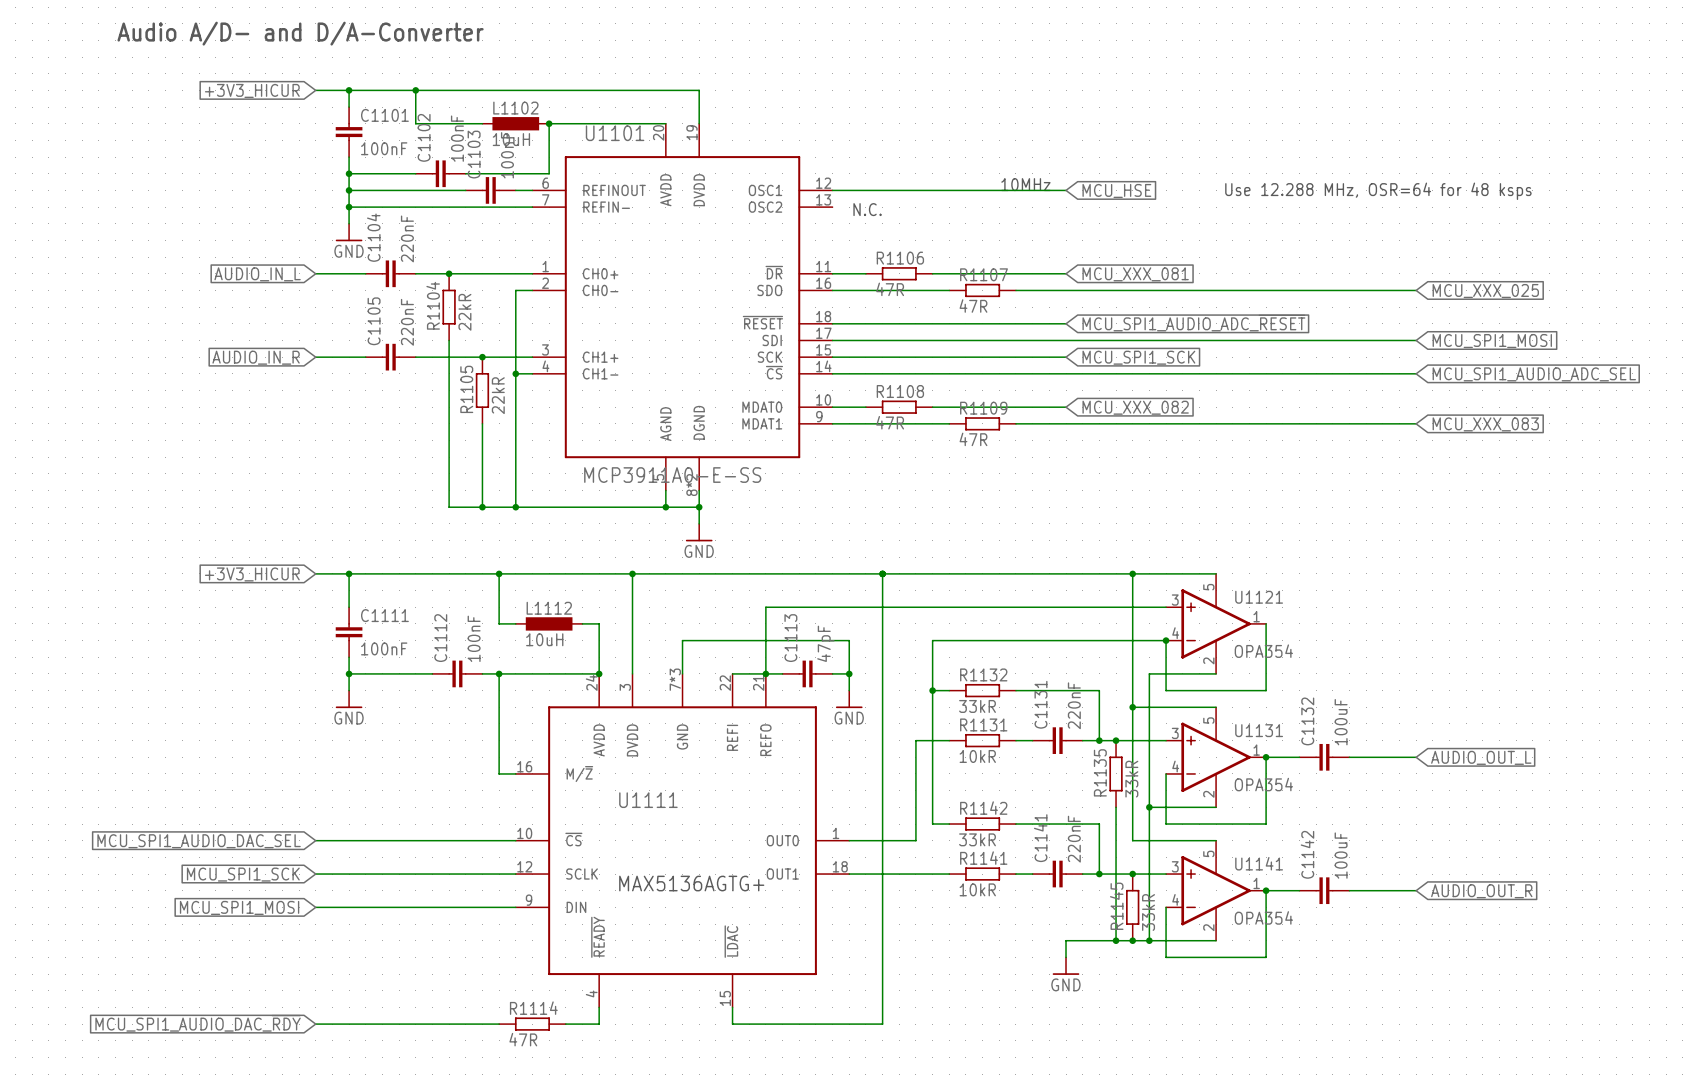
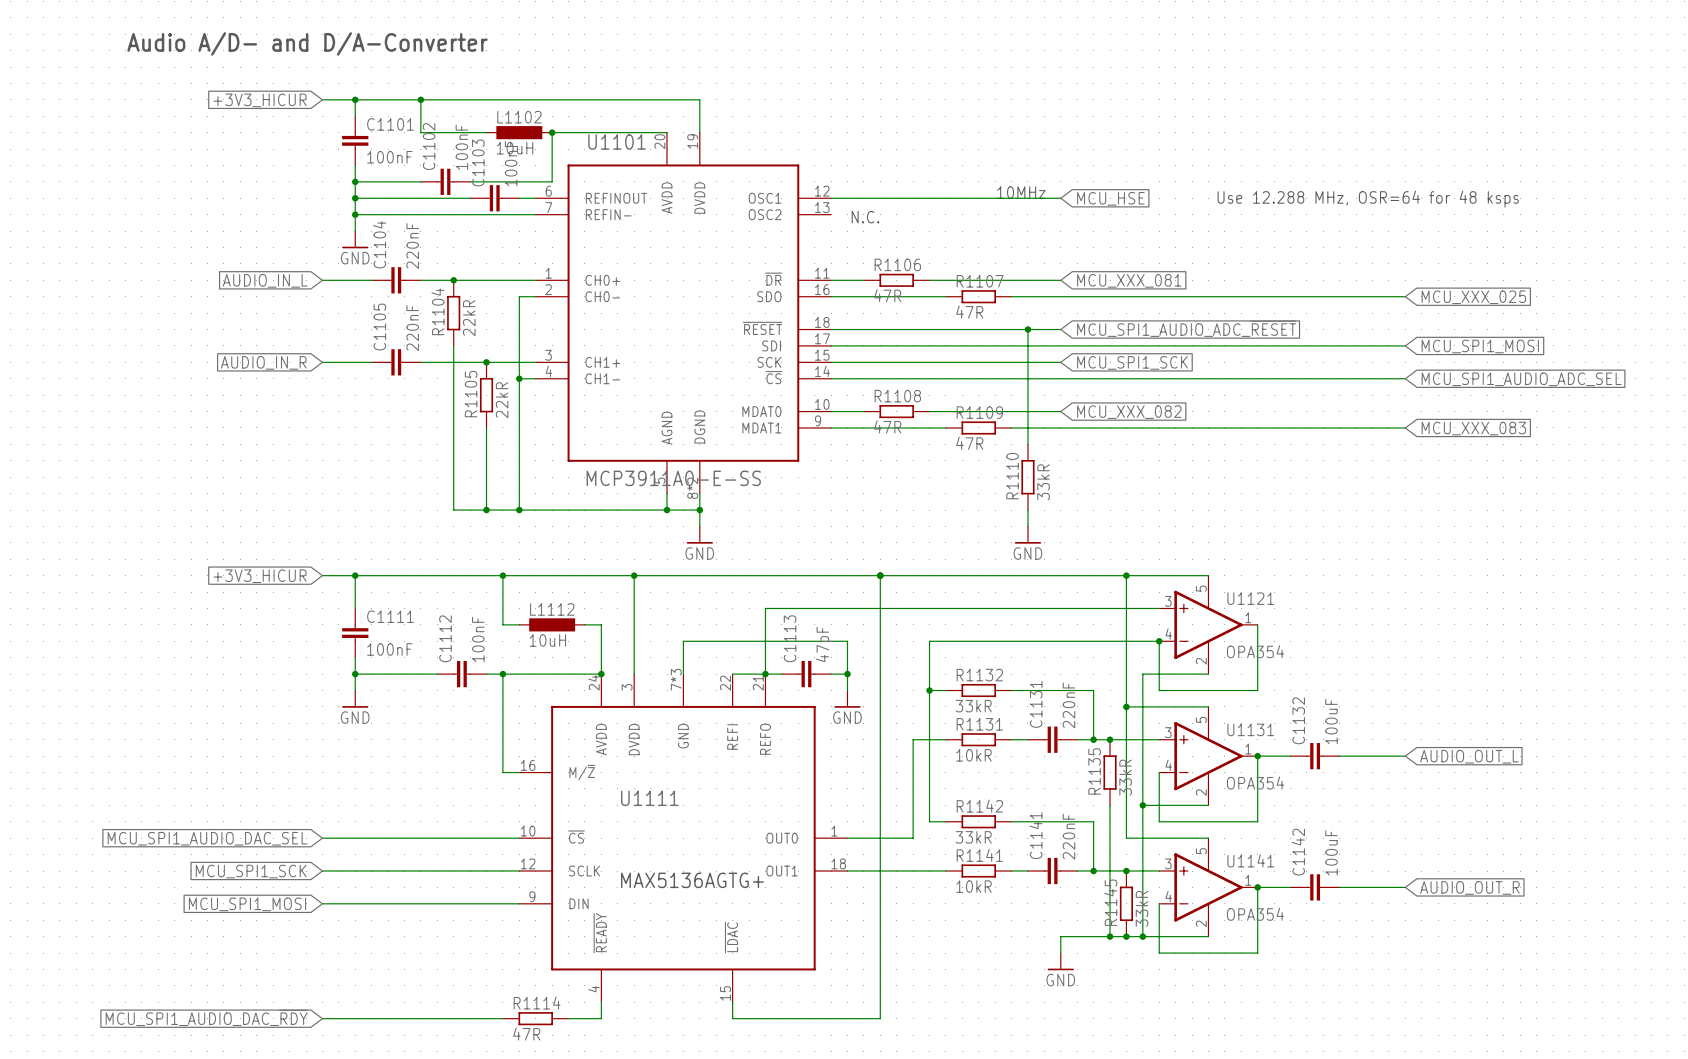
wire: none -> (1027, 329) (1027, 444)
junction: none -> (1027, 329)
R1110: none -> 33kR (1027, 477)
wire: none -> (1027, 510) (1027, 526)
power symbol: none -> GND (1027, 535)

